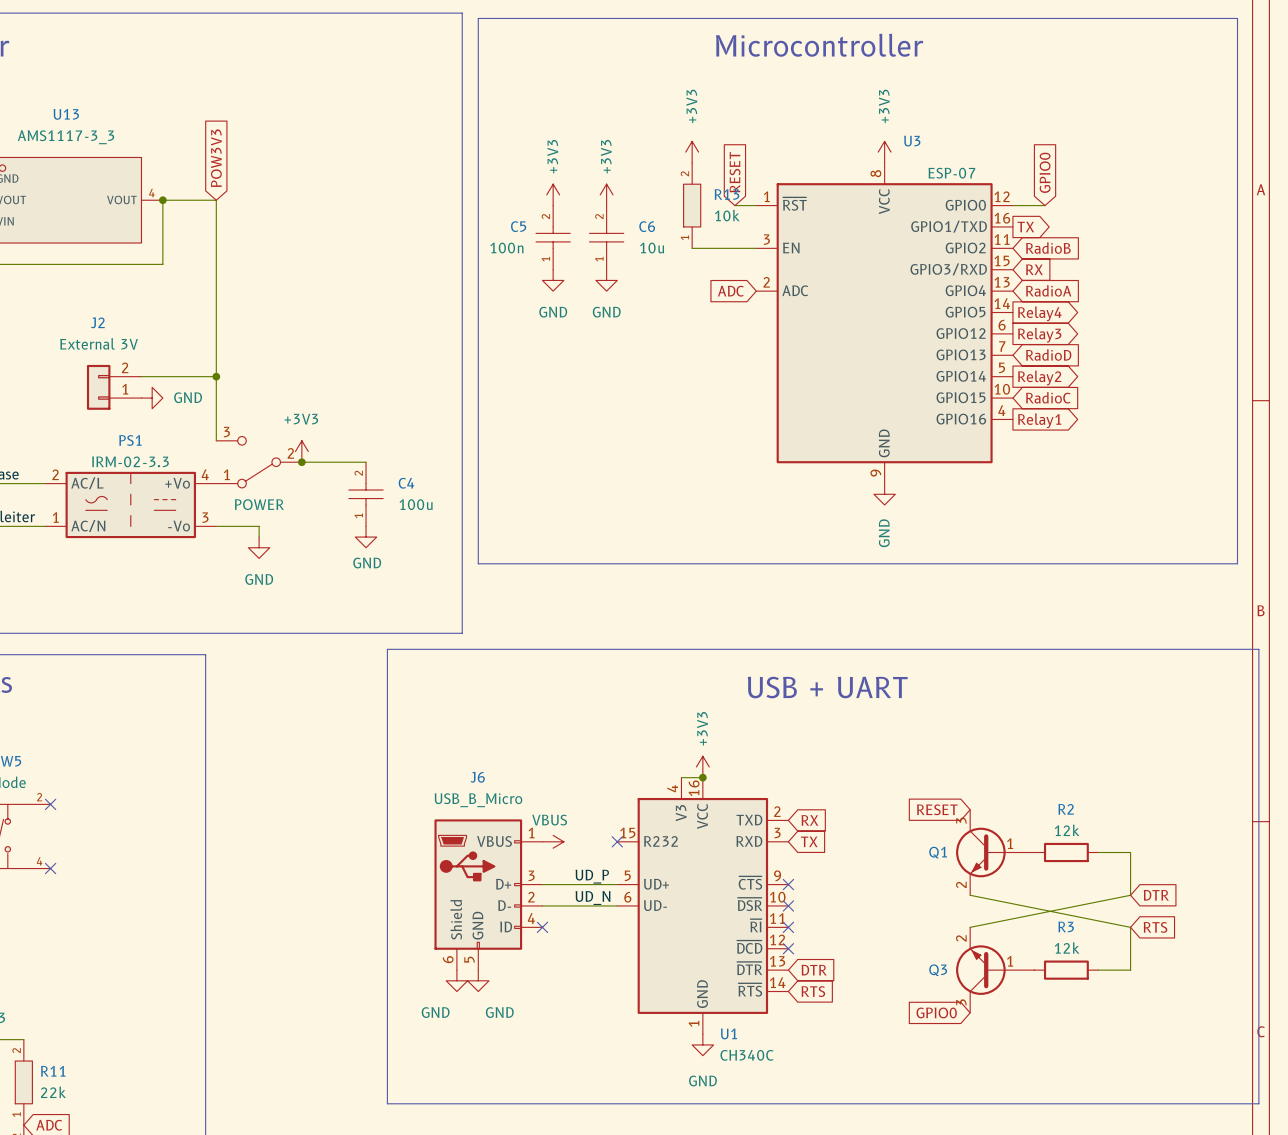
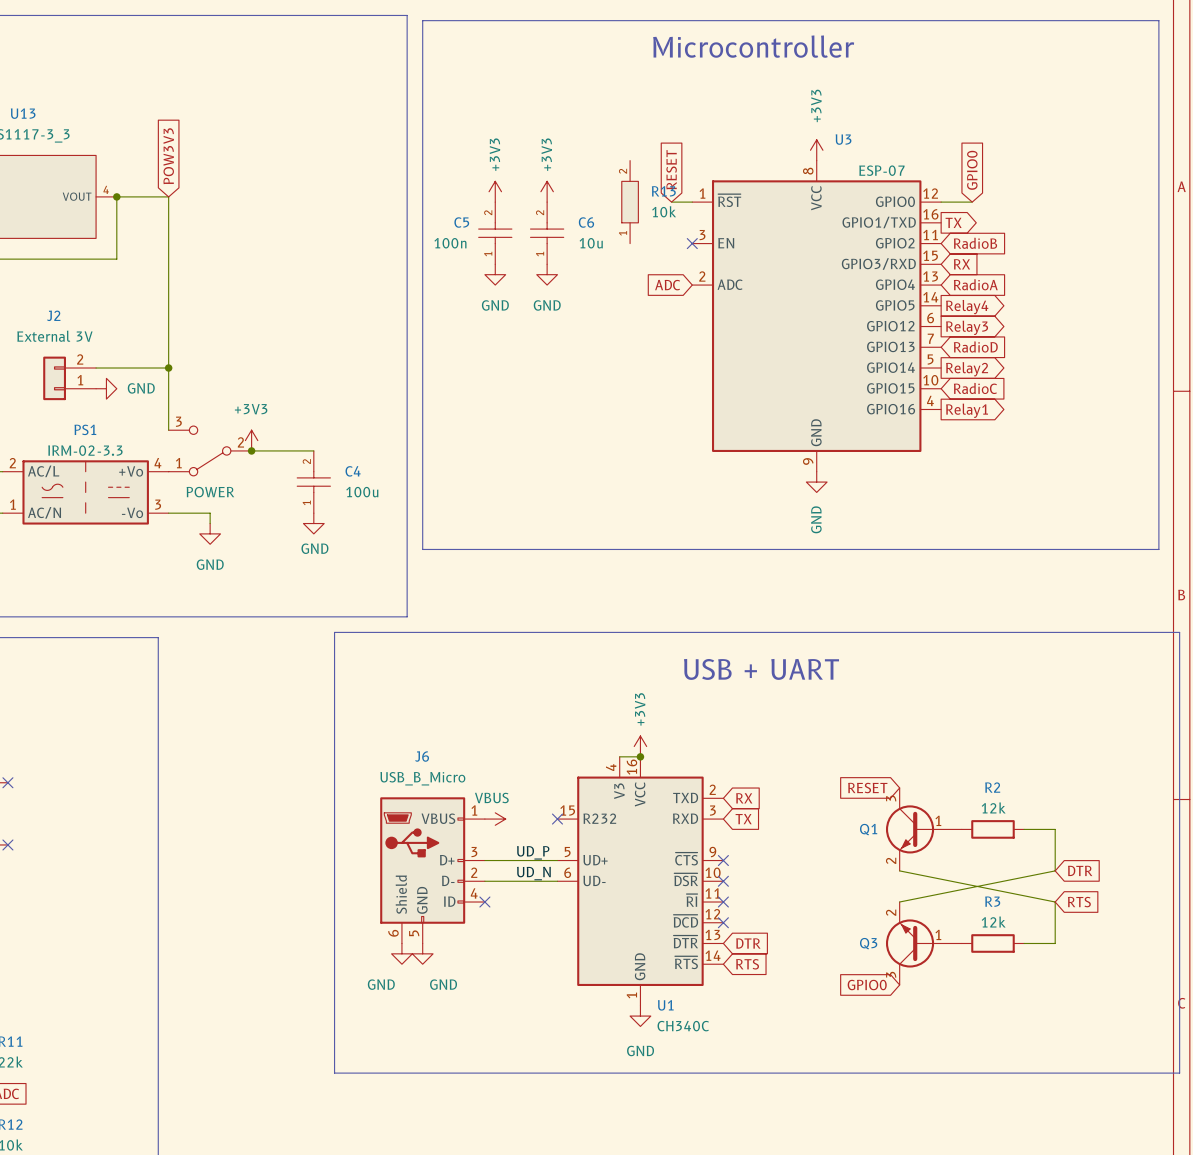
power symbol: +3V3 (692, 152) -> none
wire: (692, 248) (756, 248) -> none
no-connect mark: none -> (692, 243)

